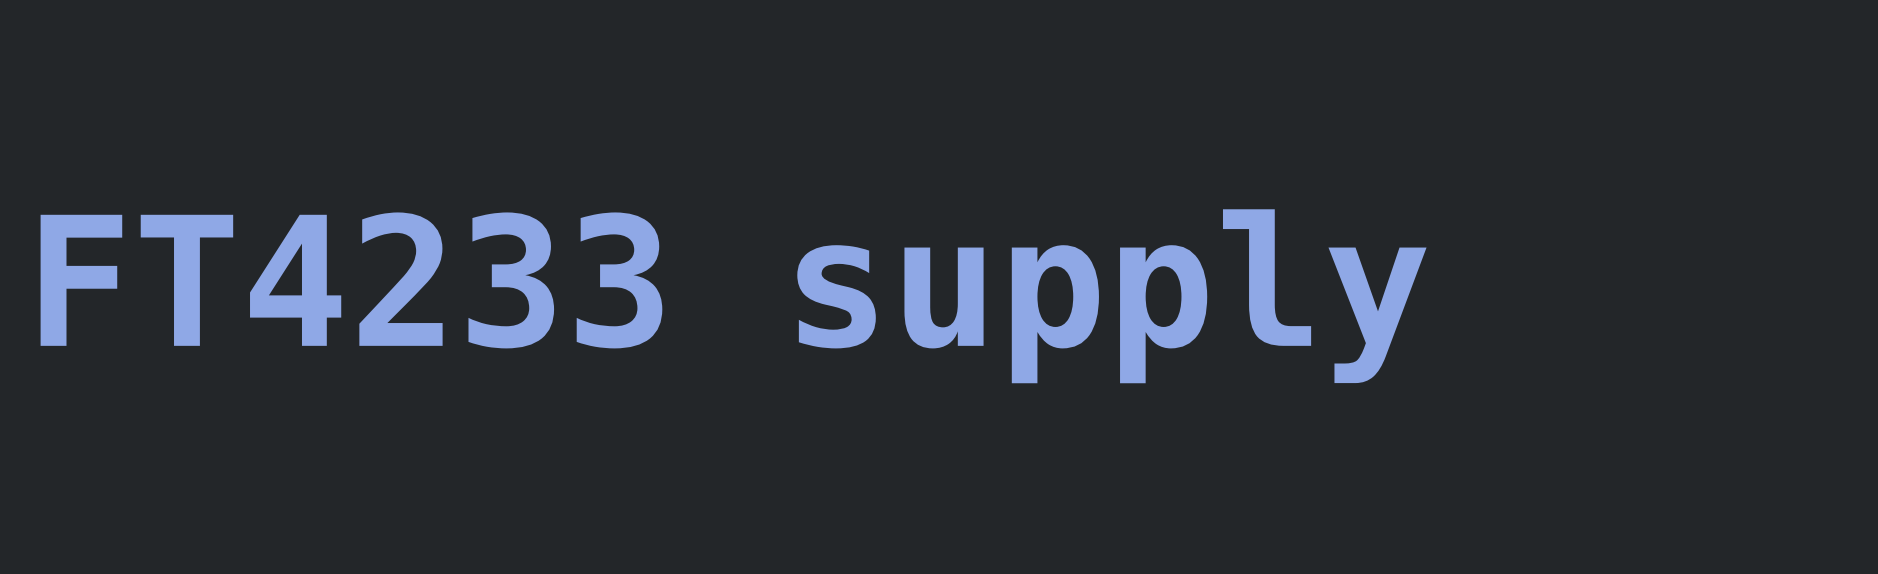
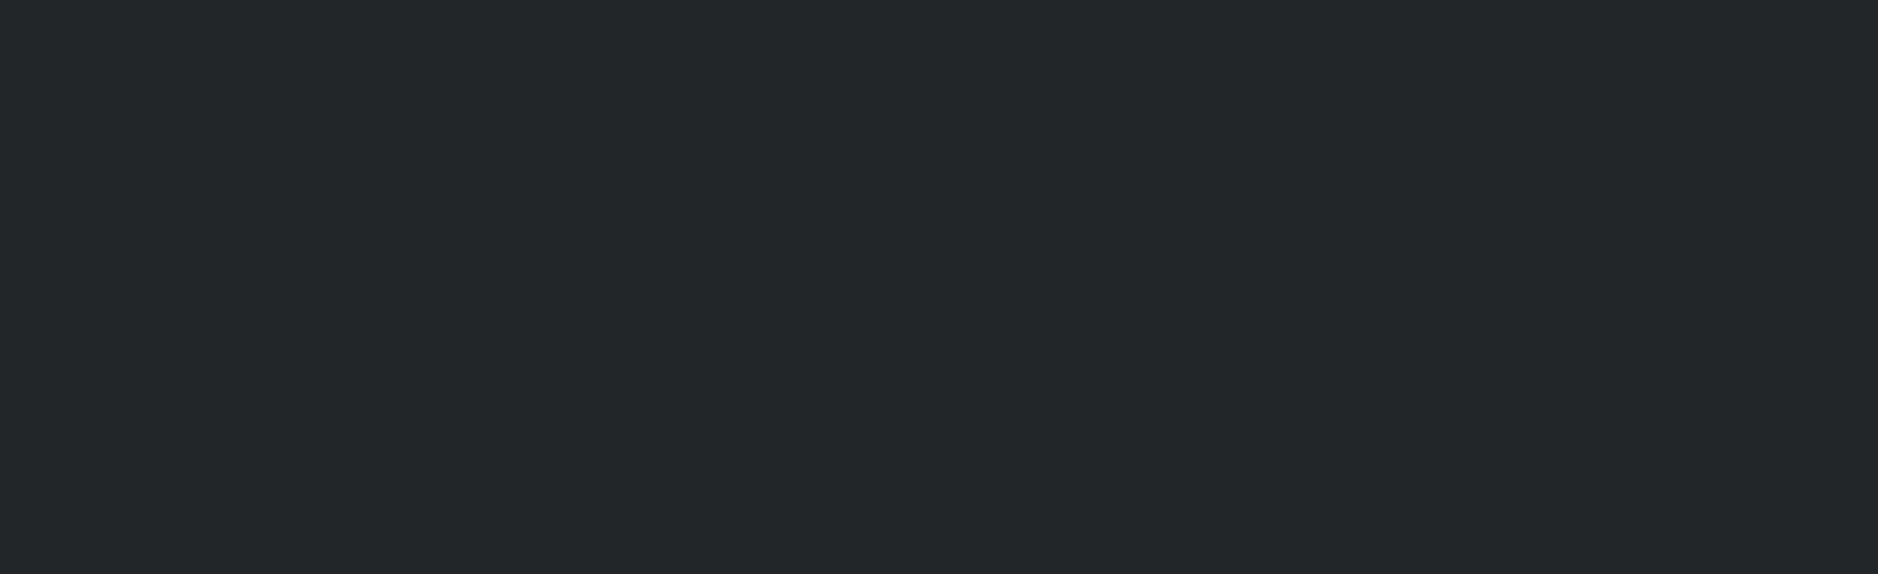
text: FT4233 supply (733, 296) -> none

